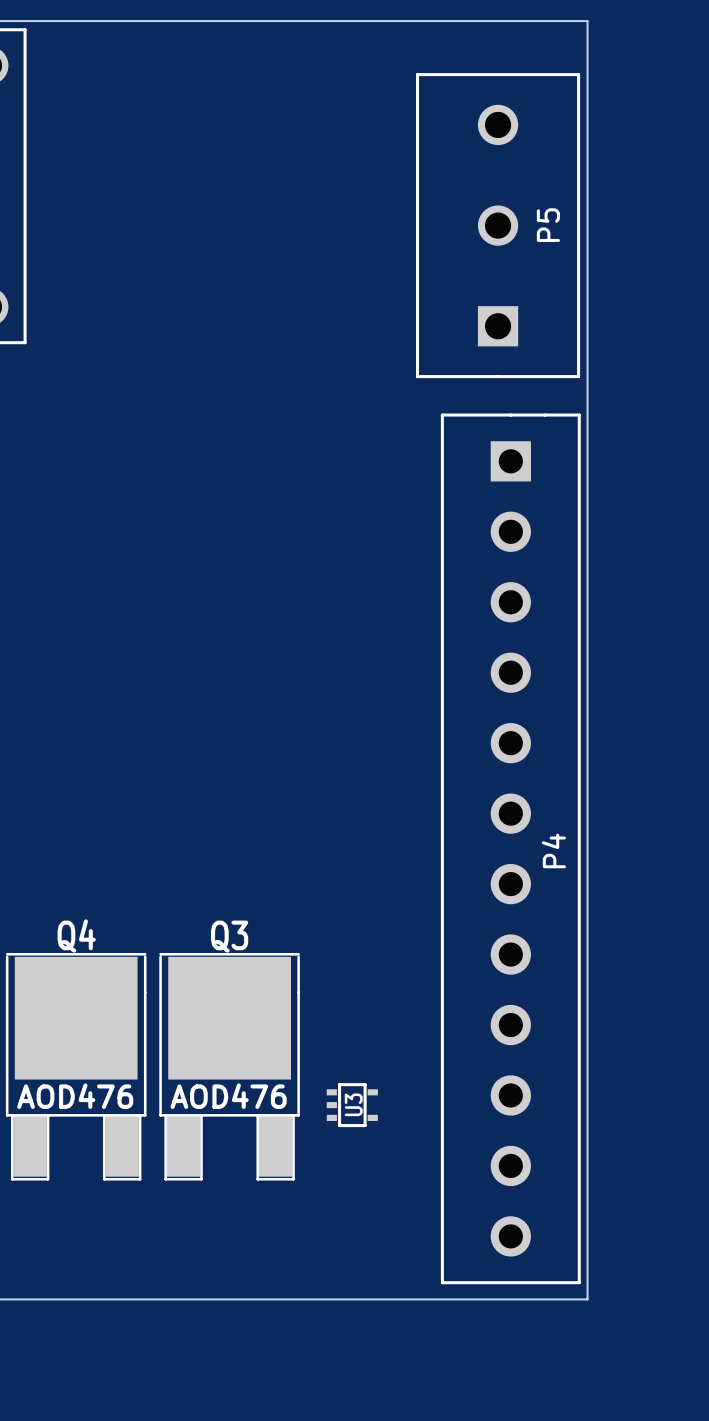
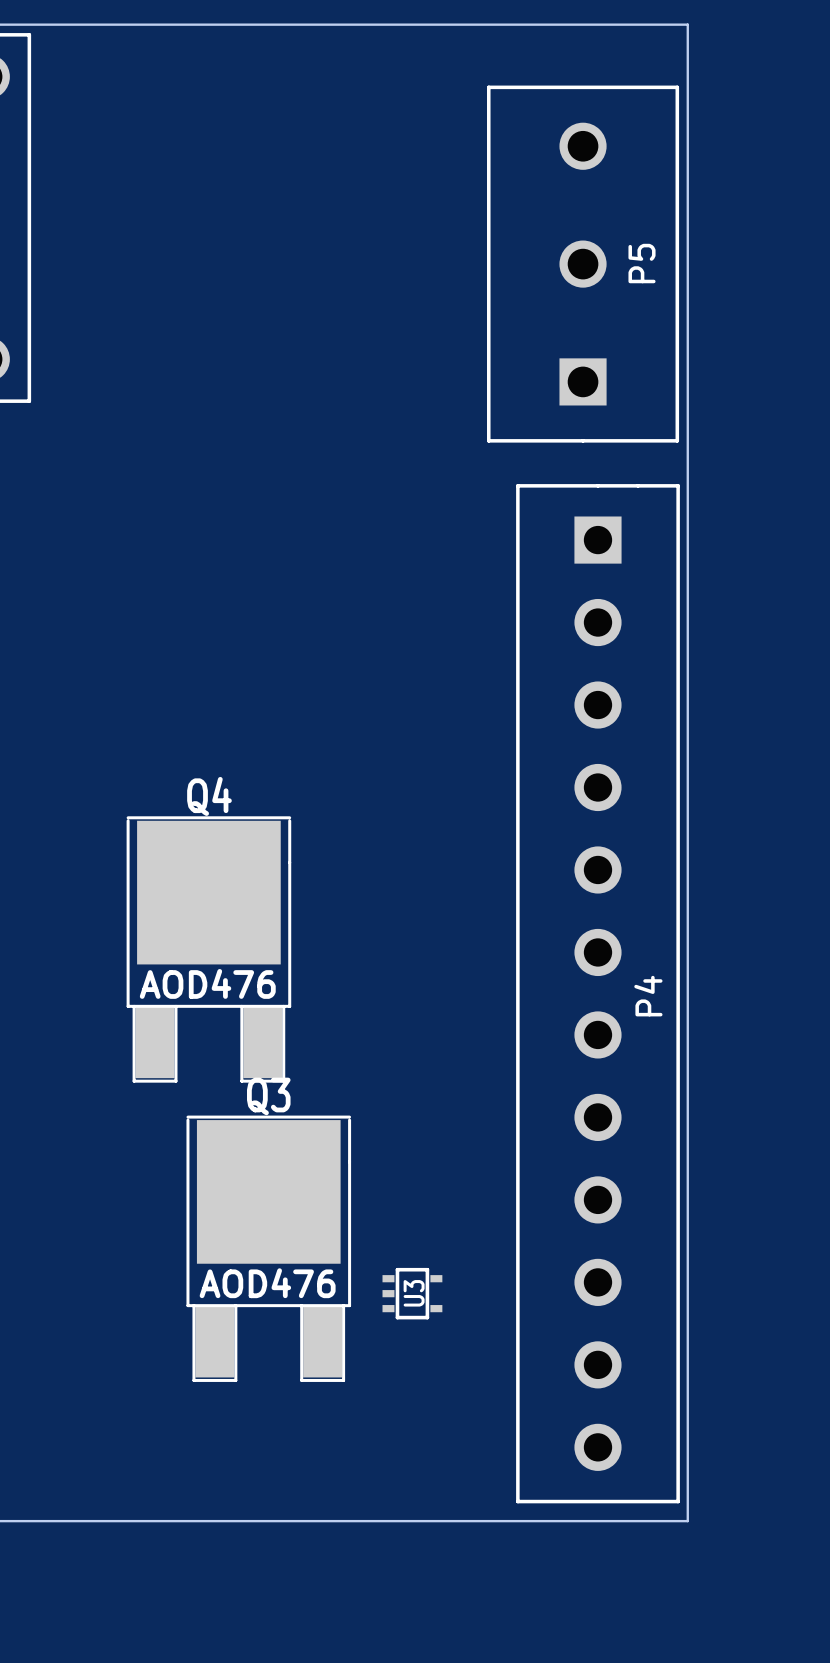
Q4 position: (76, 1066) -> (208, 949)

